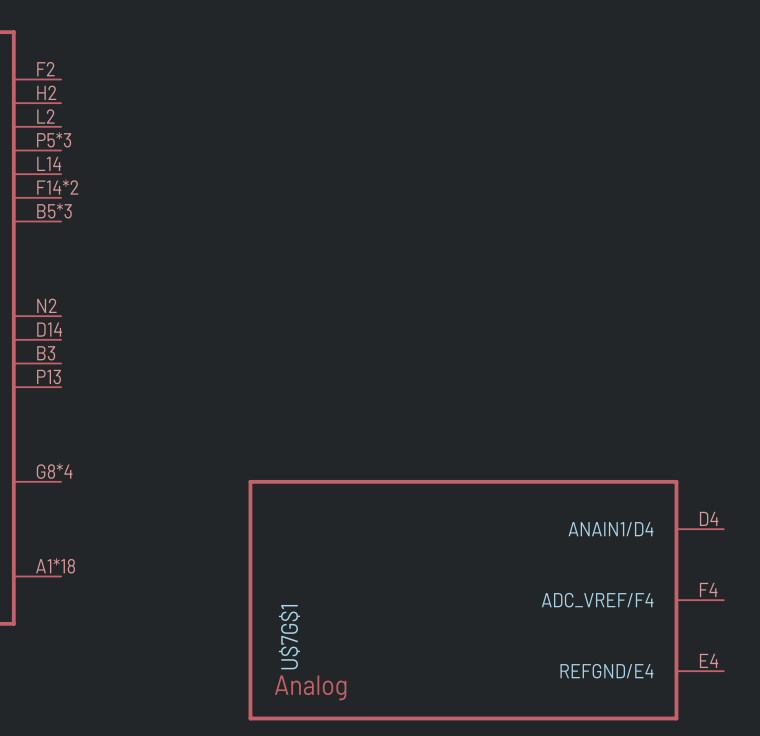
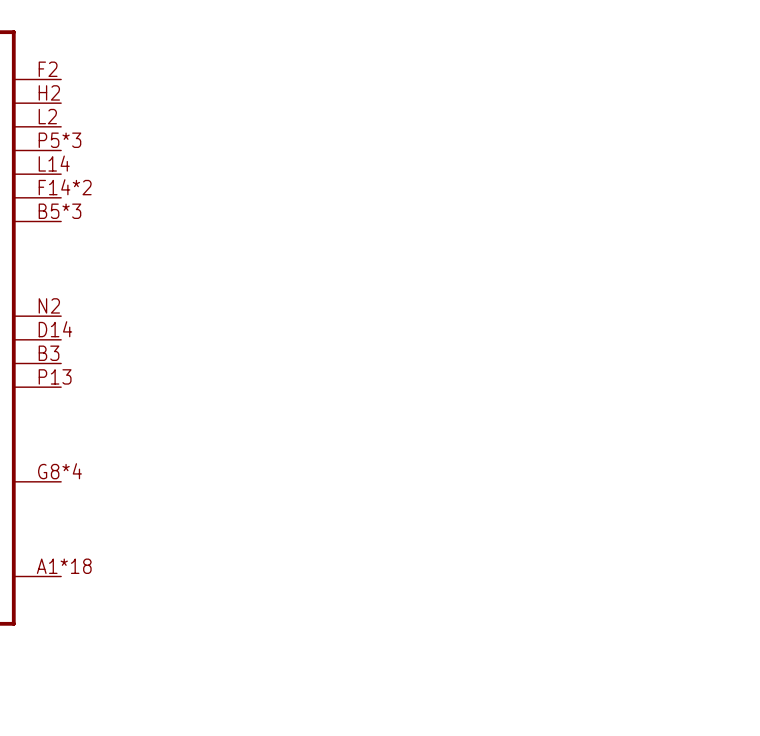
U$7G$1: (486, 600) -> none

